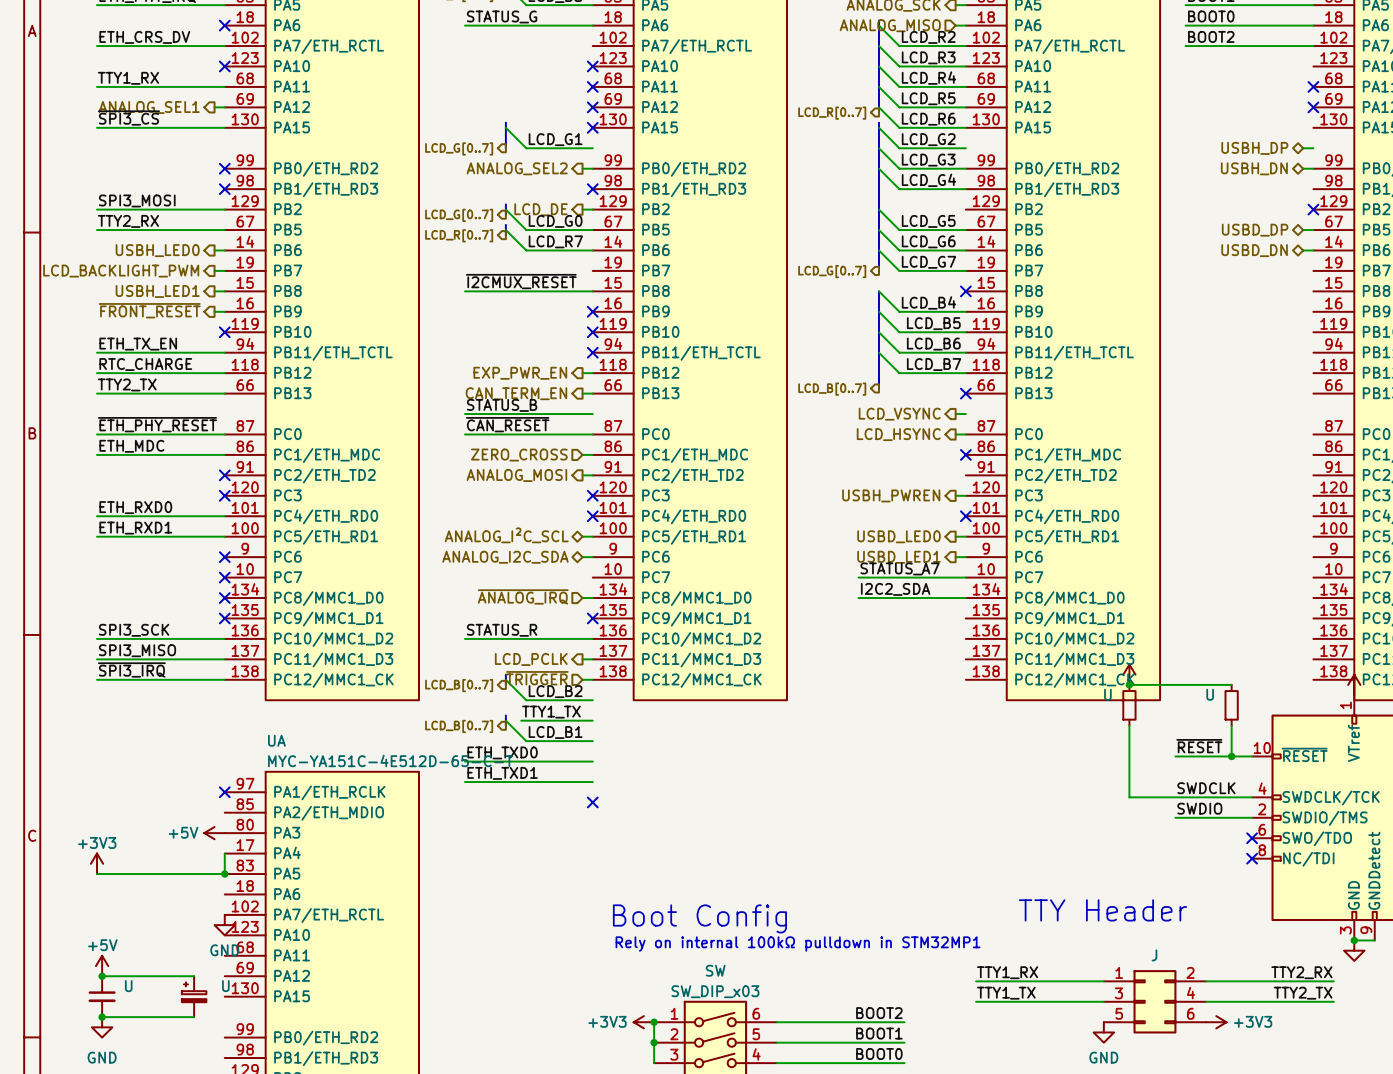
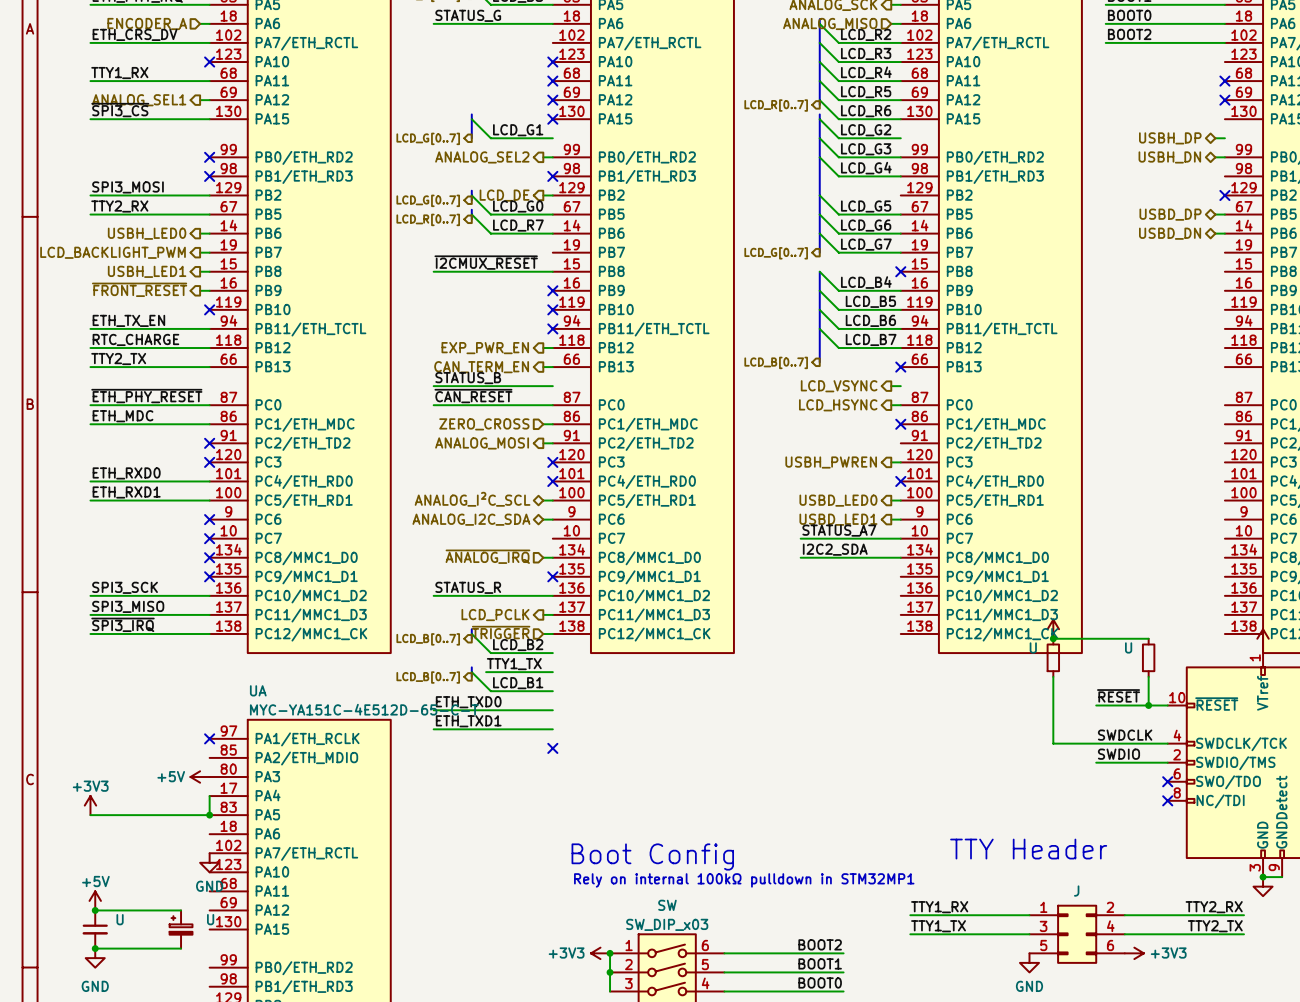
hierarchical label: none -> ENCODER_A (147, 23)
wire: none -> (200, 23) (209, 23)
no-connect mark: (224, 25) -> none

